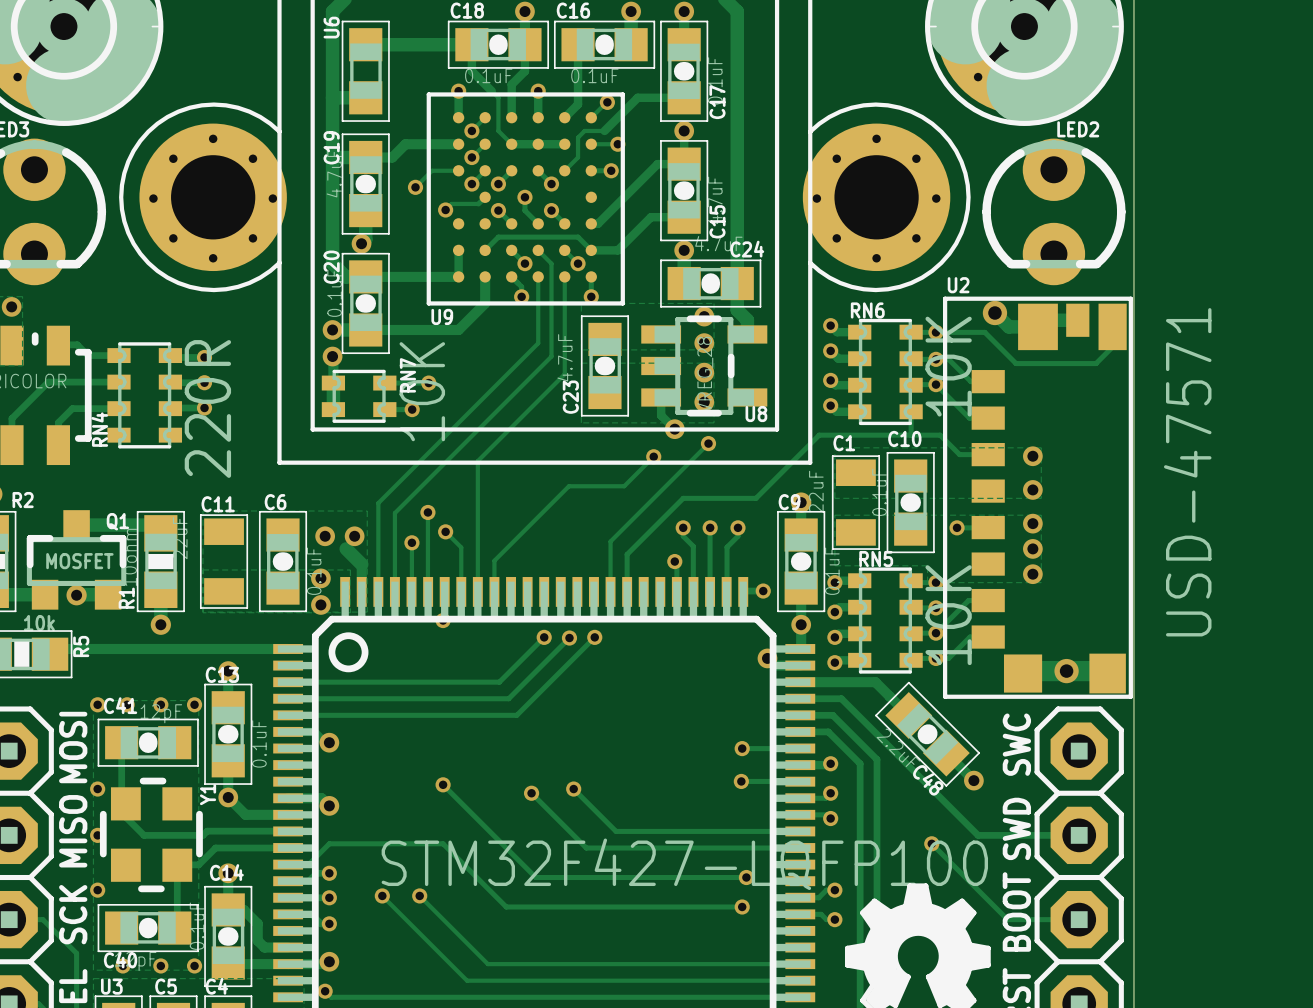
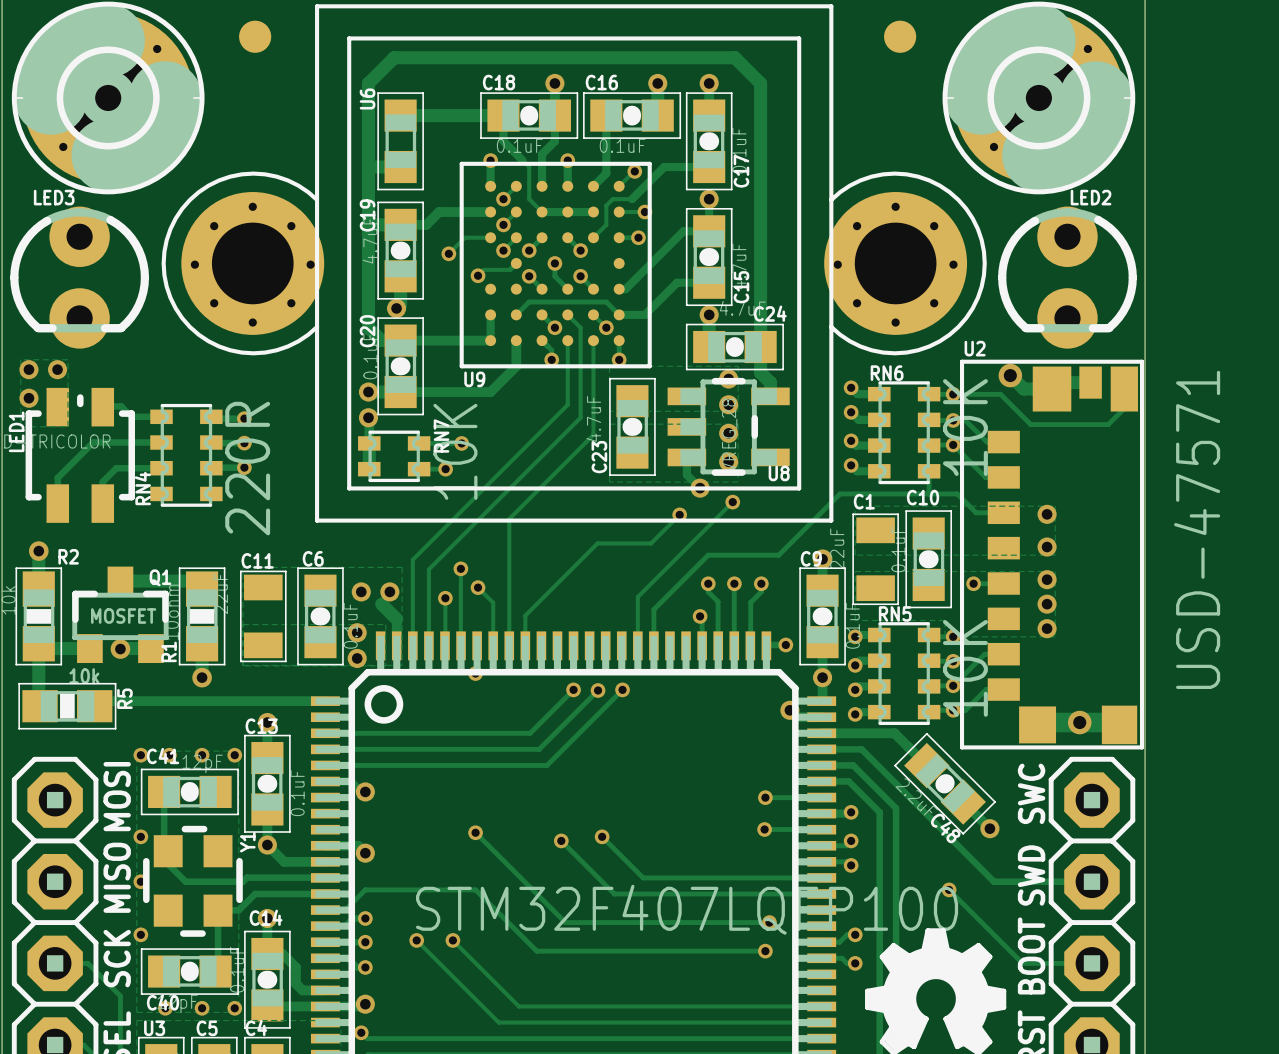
part value: STM32F427-LQFP100 (684, 864) -> STM32F407LQFP100 (687, 909)

